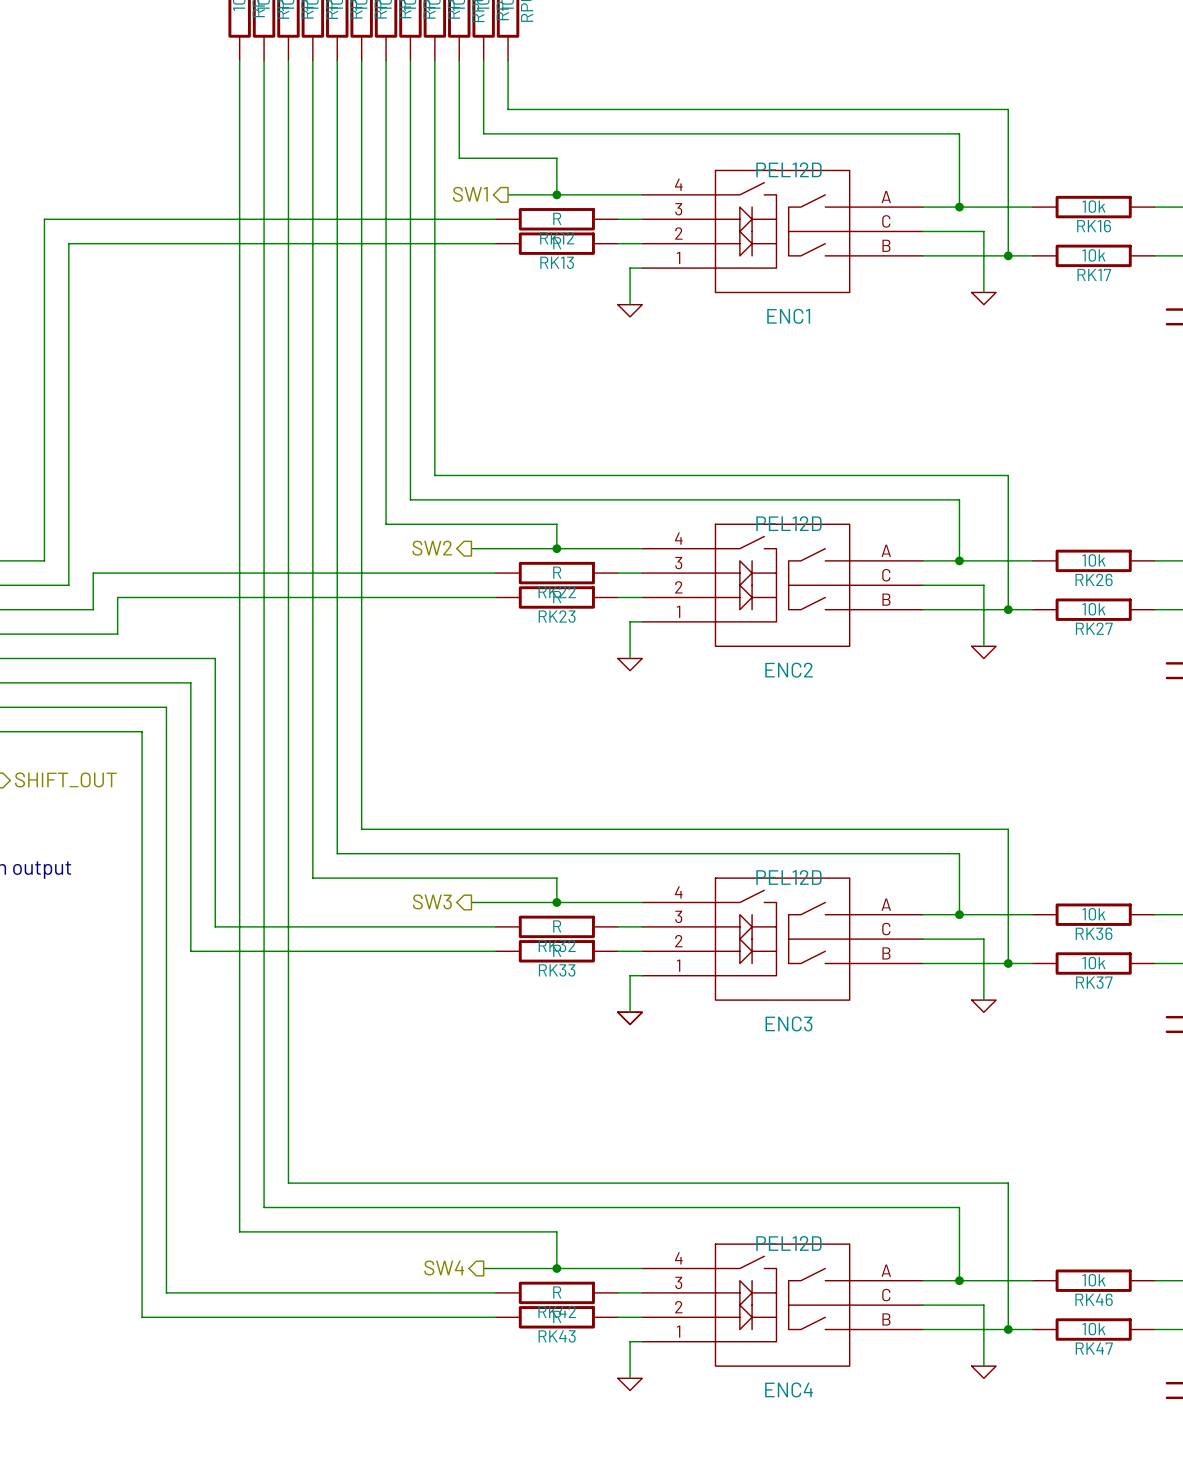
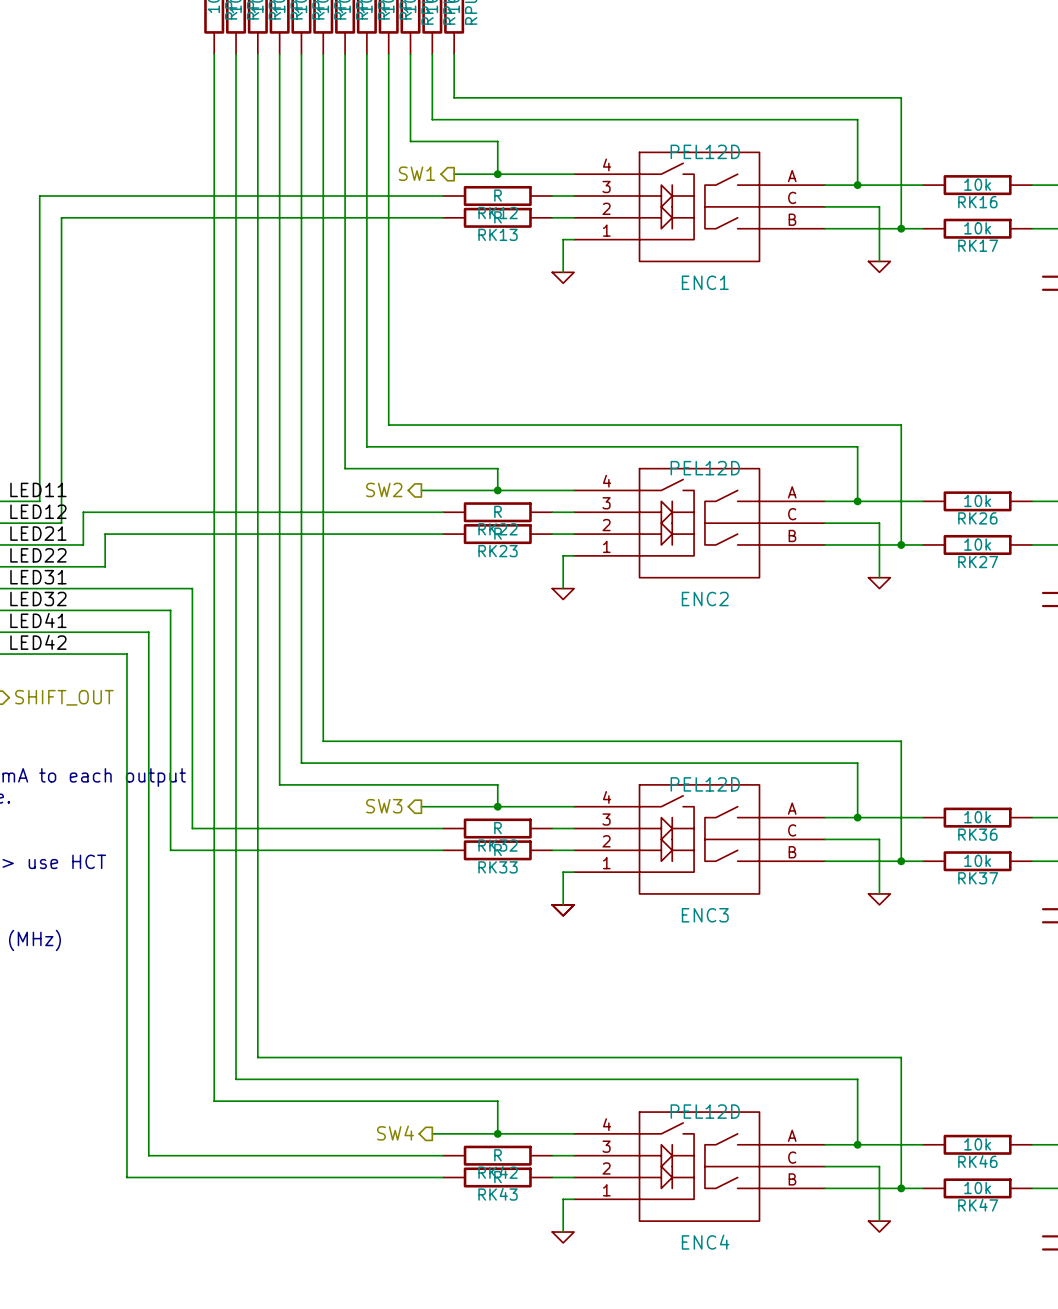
label: none -> LED11 (38, 489)
label: none -> LED12 (38, 511)
label: none -> LED21 (38, 533)
label: none -> LED22 (38, 555)
label: none -> LED31 (38, 577)
label: none -> LED32 (38, 598)
label: none -> LED41 (38, 620)
label: none -> LED42 (38, 642)

